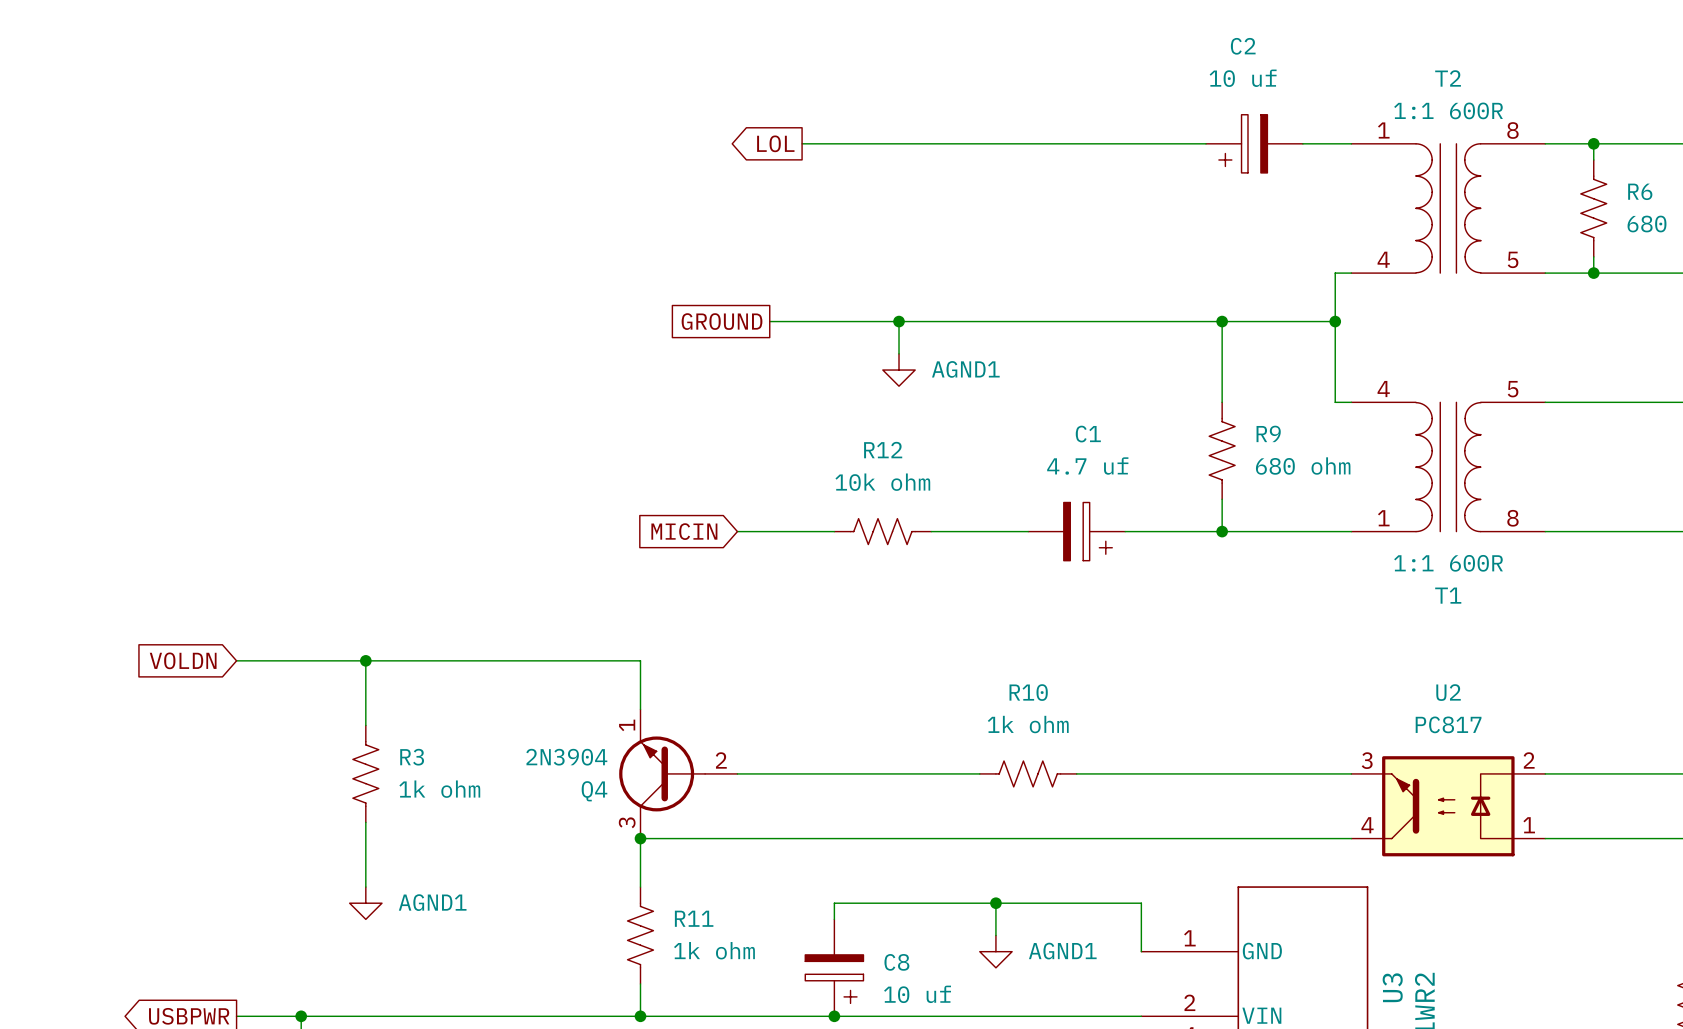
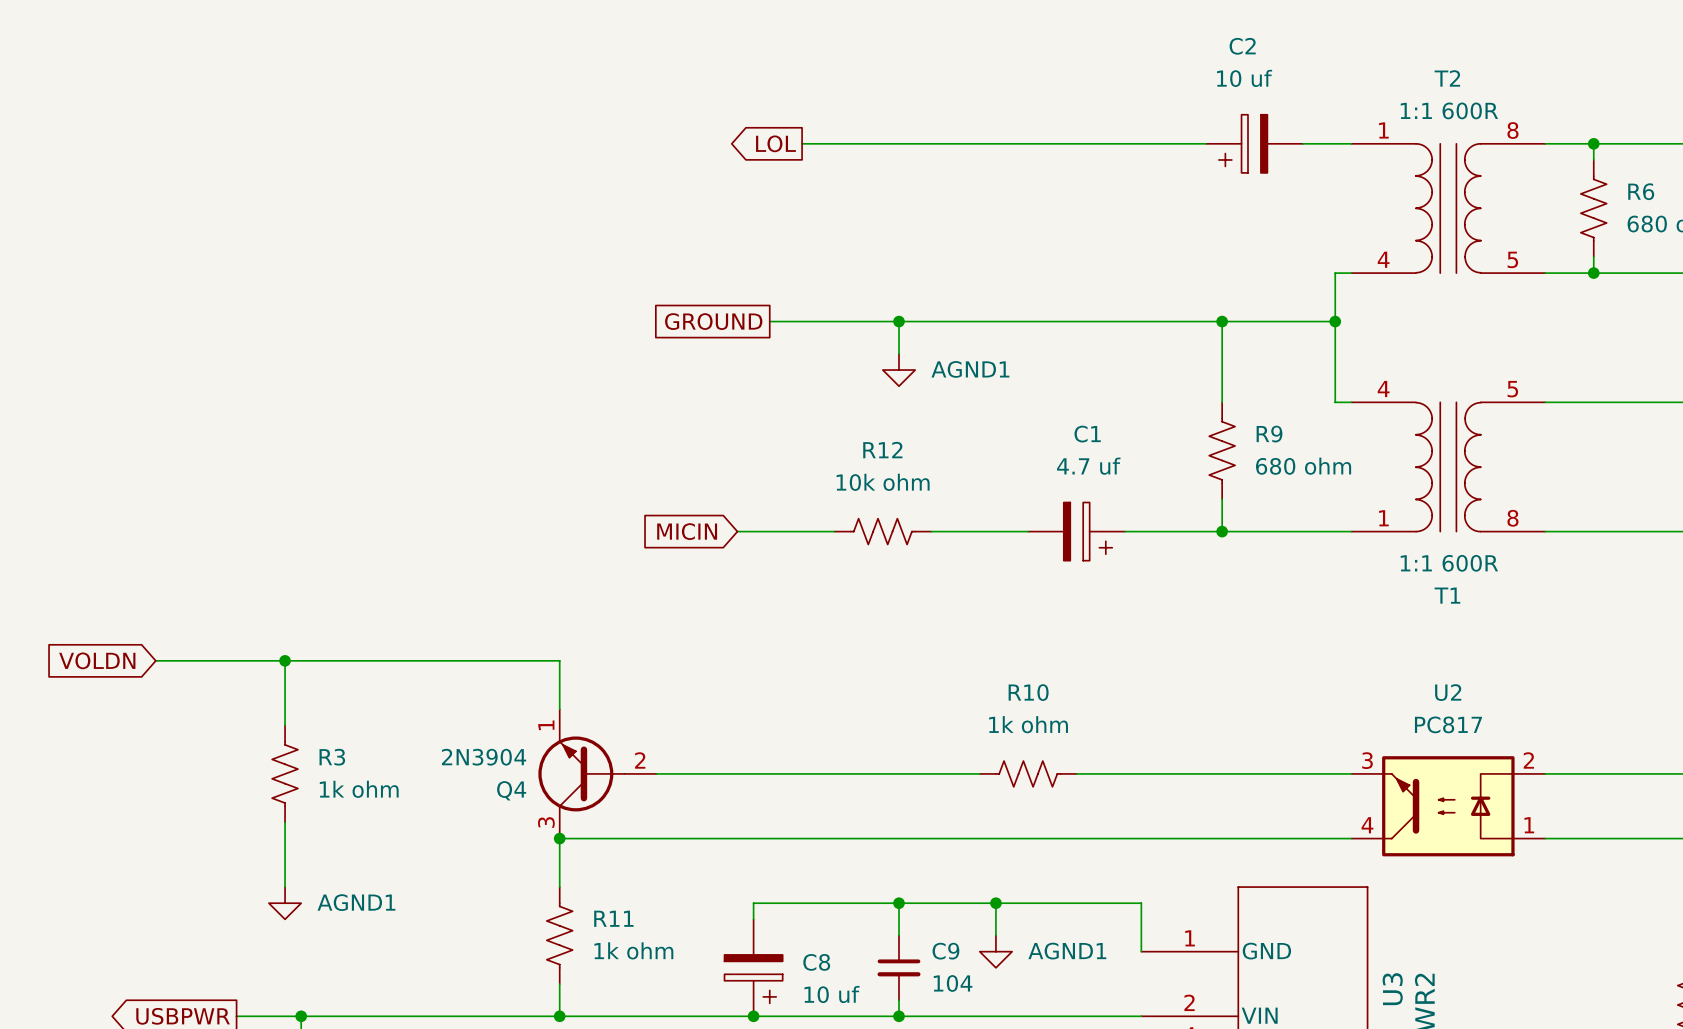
wire: none -> (155, 660) (236, 660)
global label position: VOLDN (183, 660) -> VOLDN (97, 660)
junction: none -> (285, 660)
wire: (365, 660) (365, 725) -> (285, 660) (285, 725)
junction: (365, 660) -> none
wire: (559, 660) (640, 660) (640, 709) -> (559, 660) (559, 709)
R3 position: (365, 773) -> (285, 773)
Q4 position: (678, 773) -> (597, 773)
wire: (365, 822) (365, 887) -> (285, 822) (285, 887)
junction: none -> (559, 838)
wire: (640, 838) (640, 887) -> (640, 838) (559, 838) (559, 887)
junction: (640, 838) -> none
power symbol position: AGND1 (365, 903) -> AGND1 (285, 903)
wire: (834, 903) (834, 919) -> (834, 903) (753, 903) (753, 919)
wire: none -> (899, 903) (899, 935)
junction: none -> (899, 903)
R11 position: (640, 935) -> (559, 935)
C8 position: (834, 967) -> (753, 967)
C9: none -> 104 (899, 967)
wire: (640, 983) (640, 1016) -> (559, 983) (559, 1016)
wire: none -> (899, 1000) (899, 1016)
junction: none -> (559, 1016)
junction: (640, 1016) -> none
junction: none -> (753, 1016)
junction: (834, 1016) -> none
junction: none -> (899, 1016)

